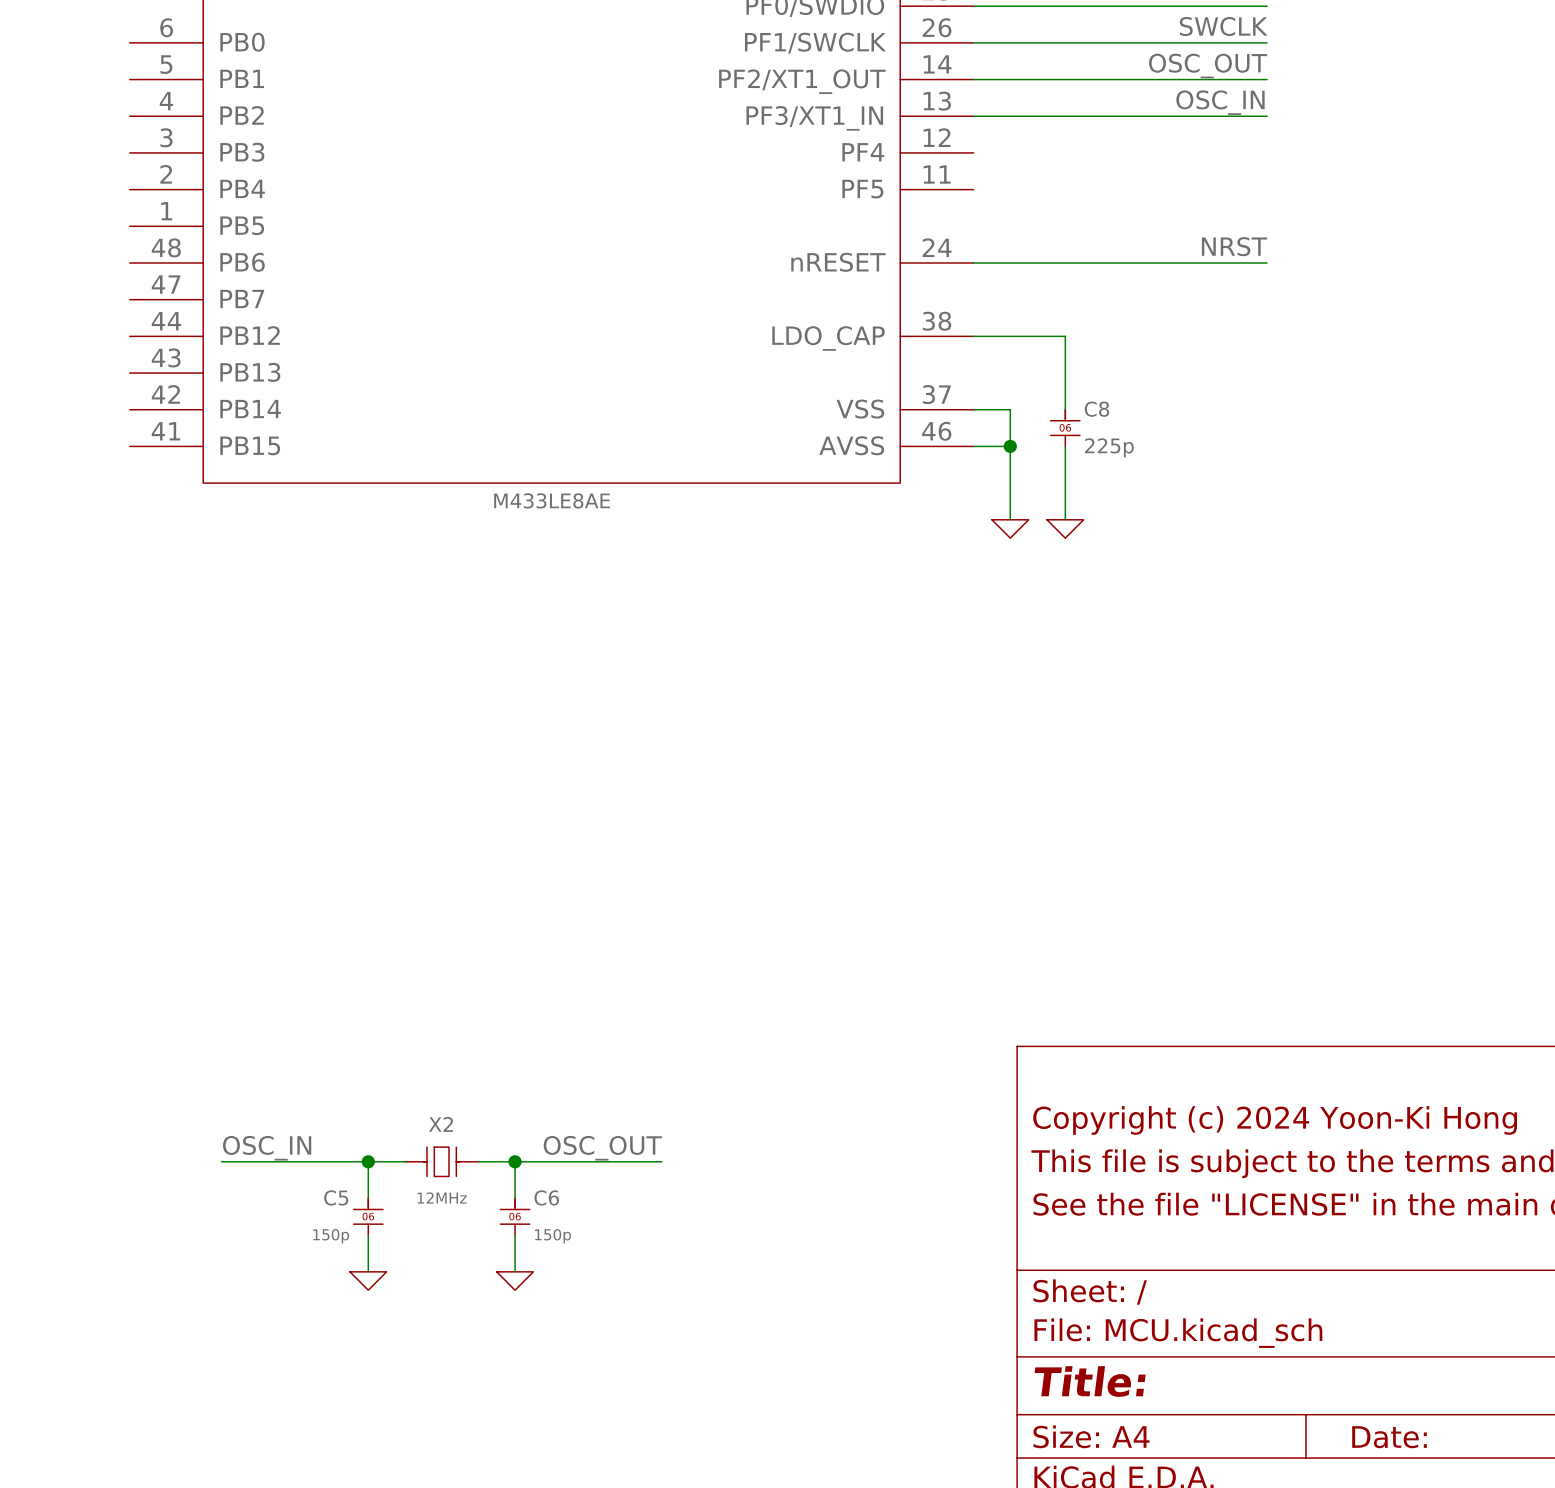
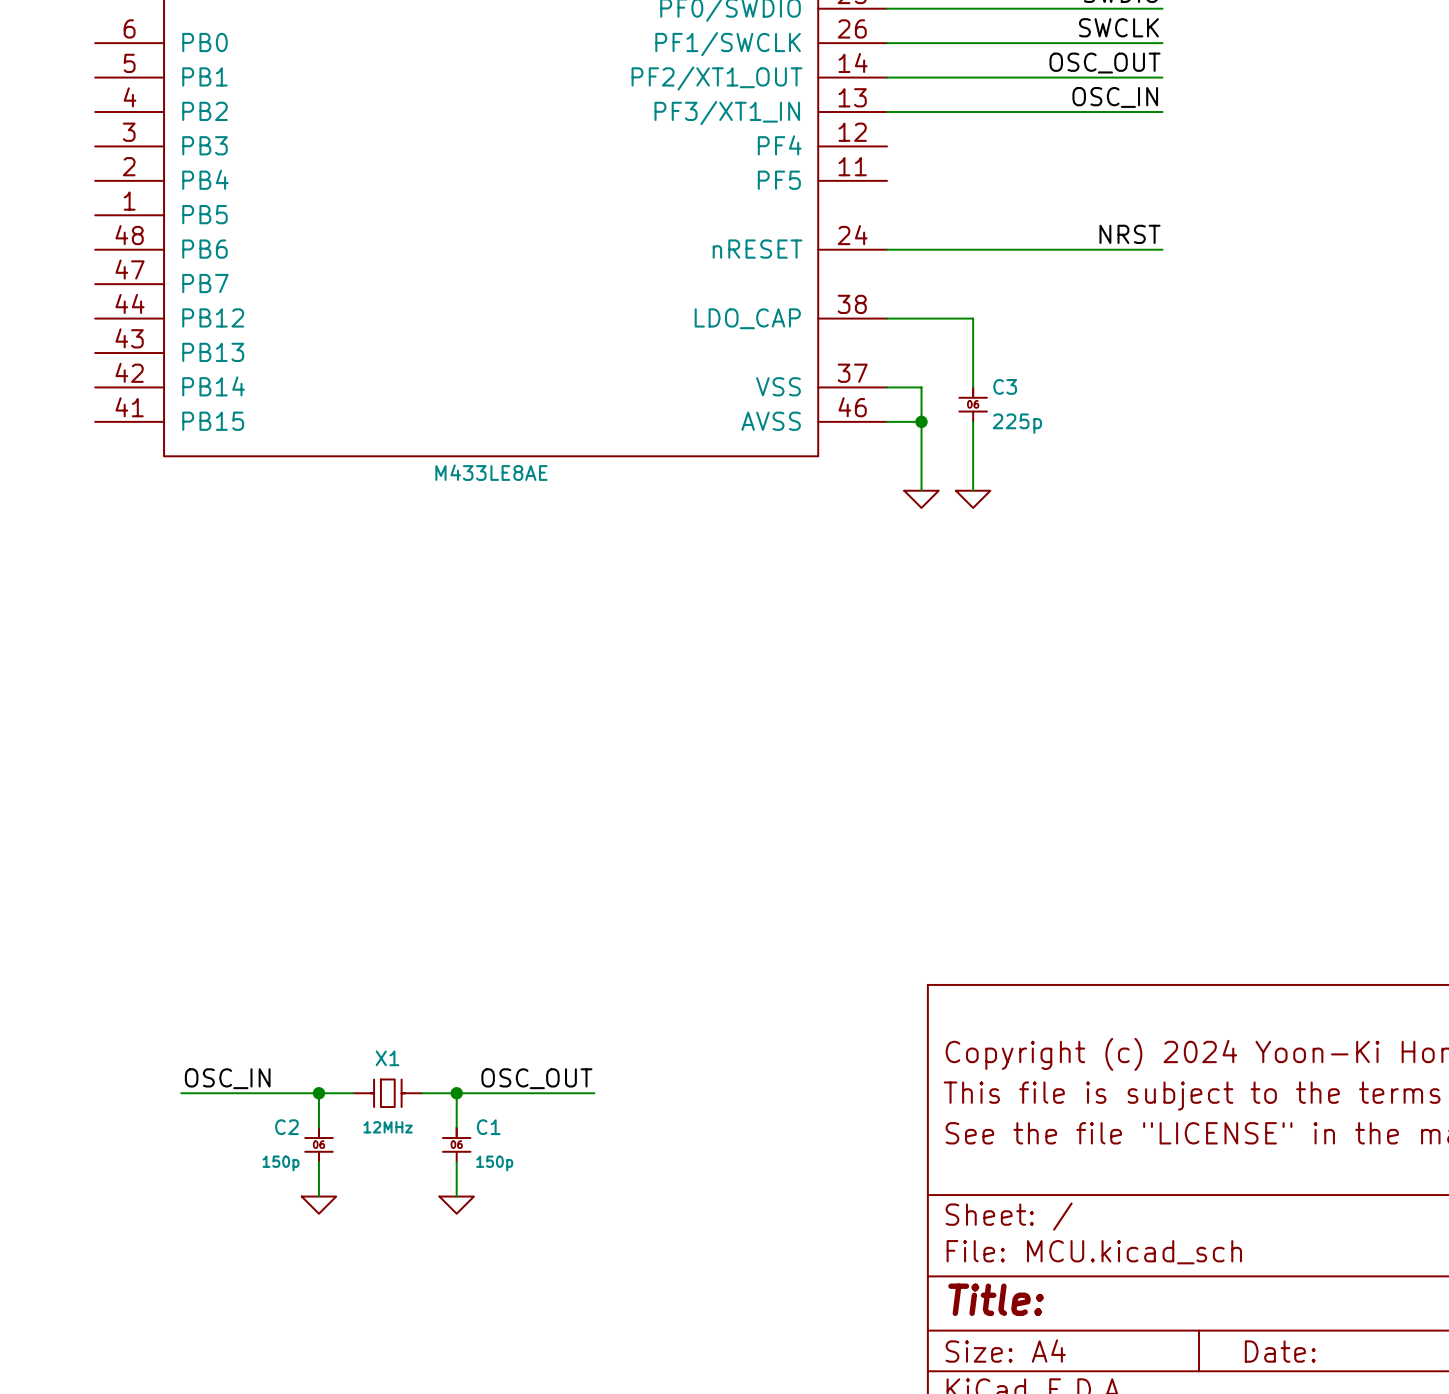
C8 name: C8 (1096, 409) -> C3 (1005, 386)
X2 name: X2 (440, 1124) -> X1 (387, 1058)
C5 name: C5 (336, 1197) -> C2 (286, 1127)
C6 name: C6 (546, 1197) -> C1 (488, 1127)

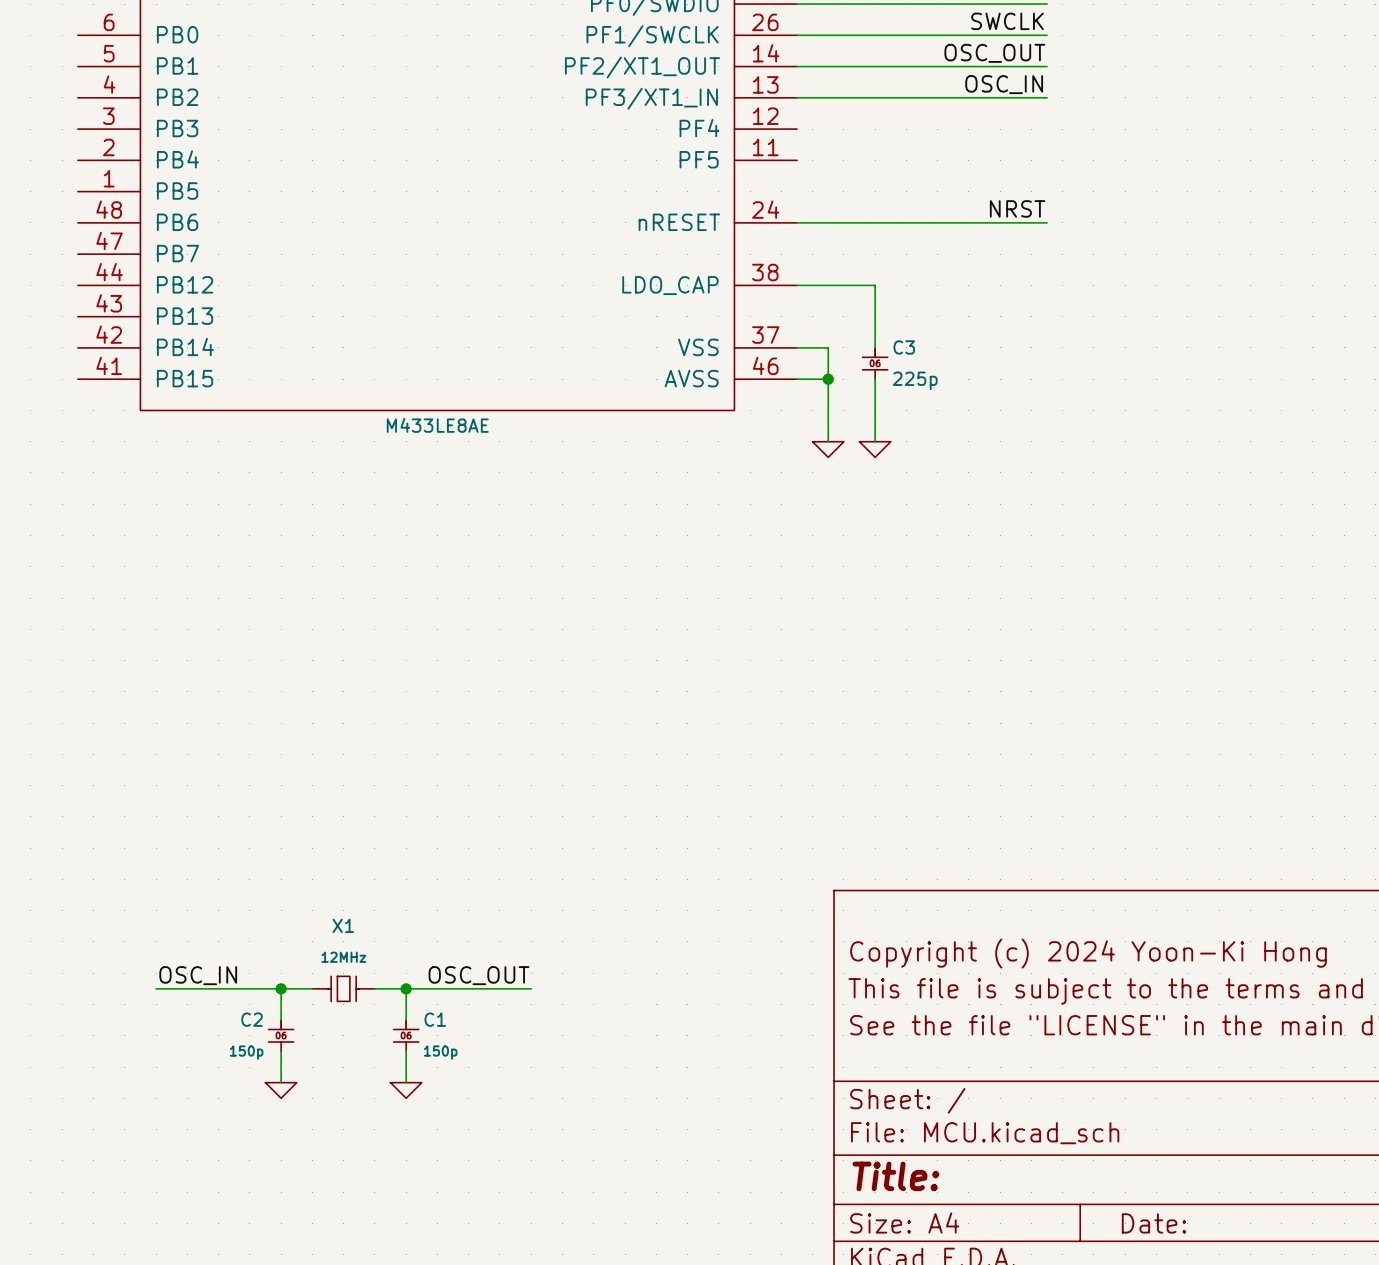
X1 name position: X1 (387, 1058) -> X1 (343, 925)
X1 text position: 12MHz (388, 1127) -> 12MHz (343, 957)

